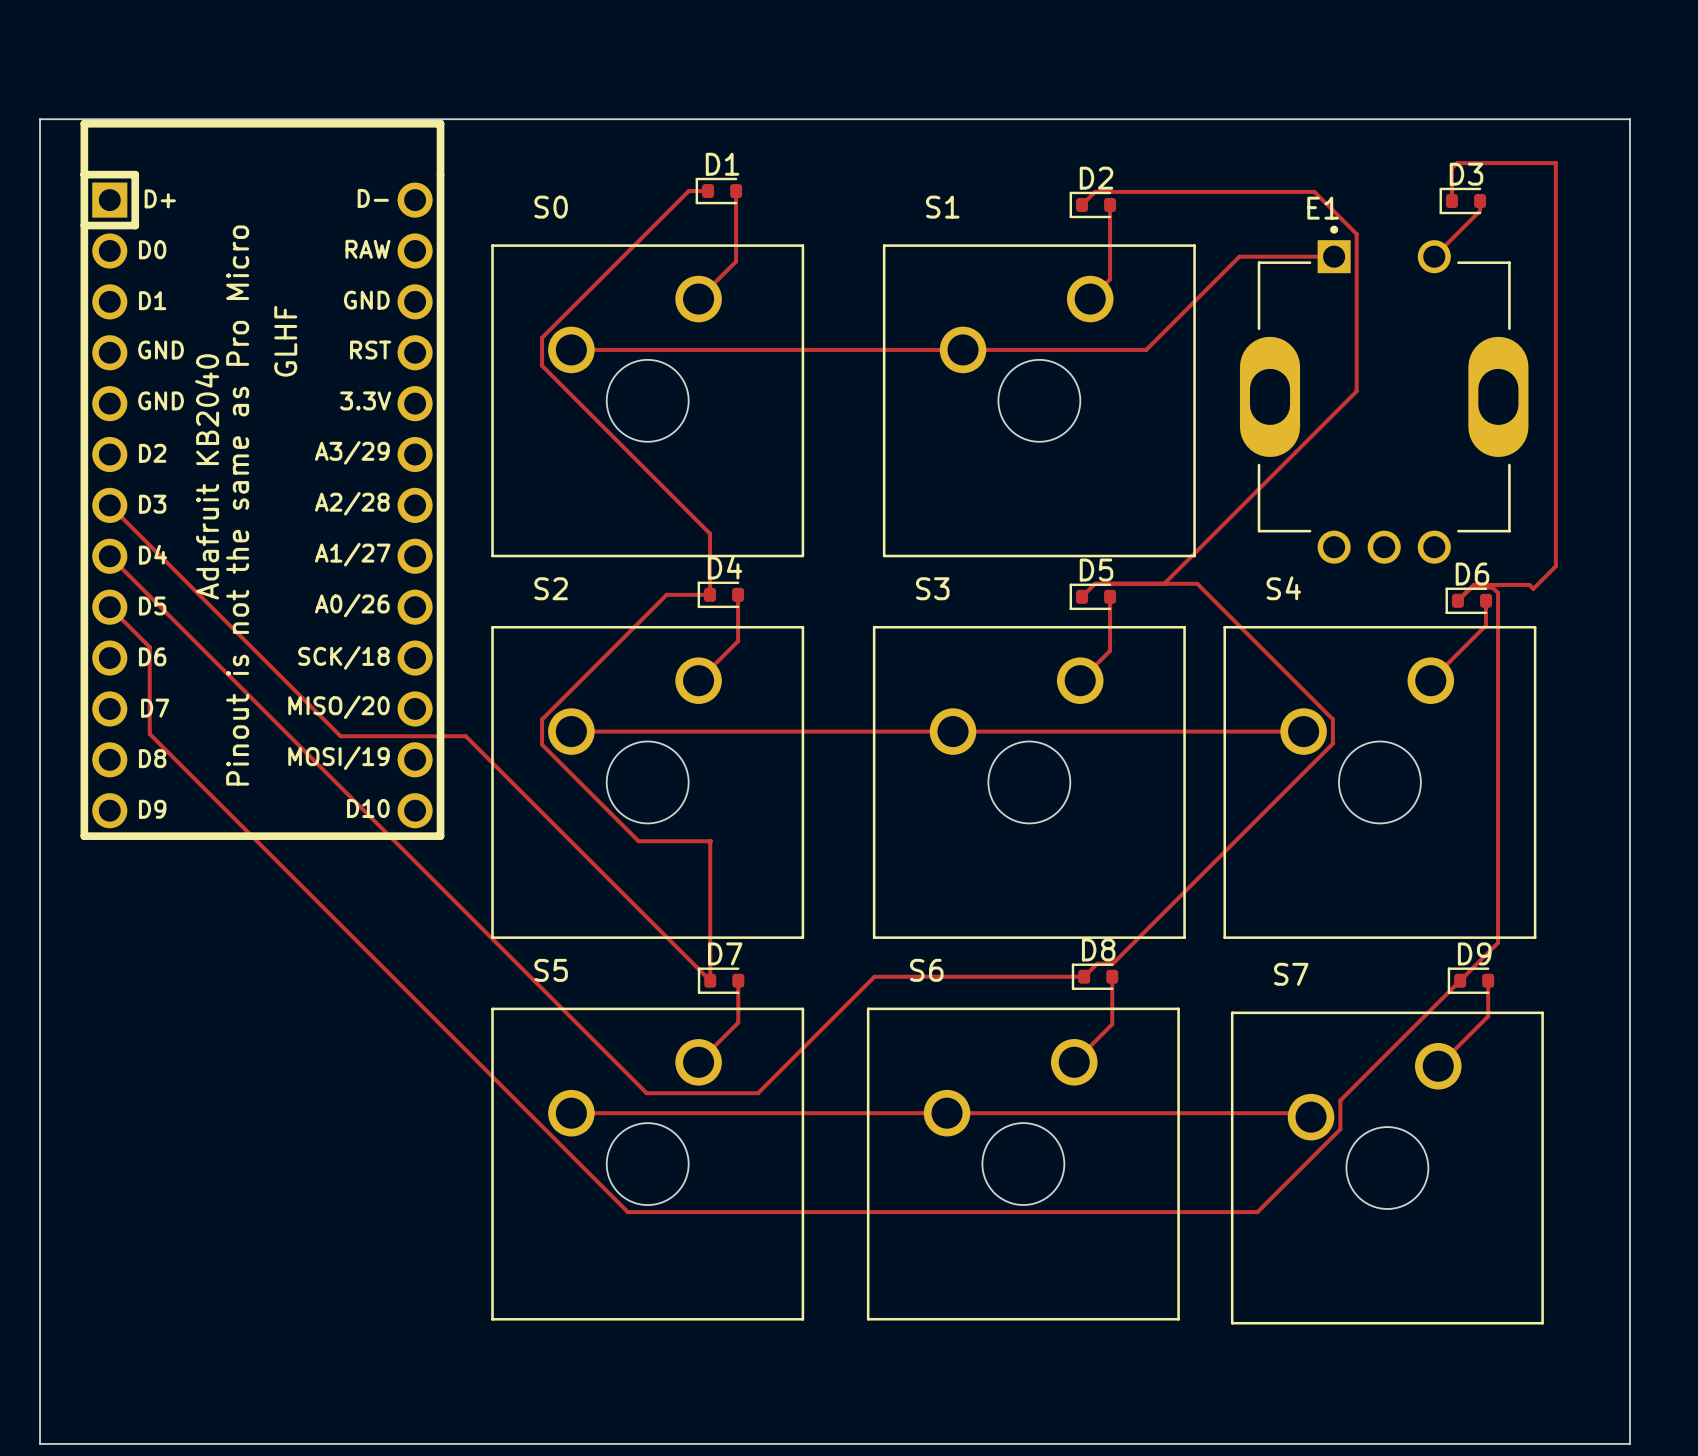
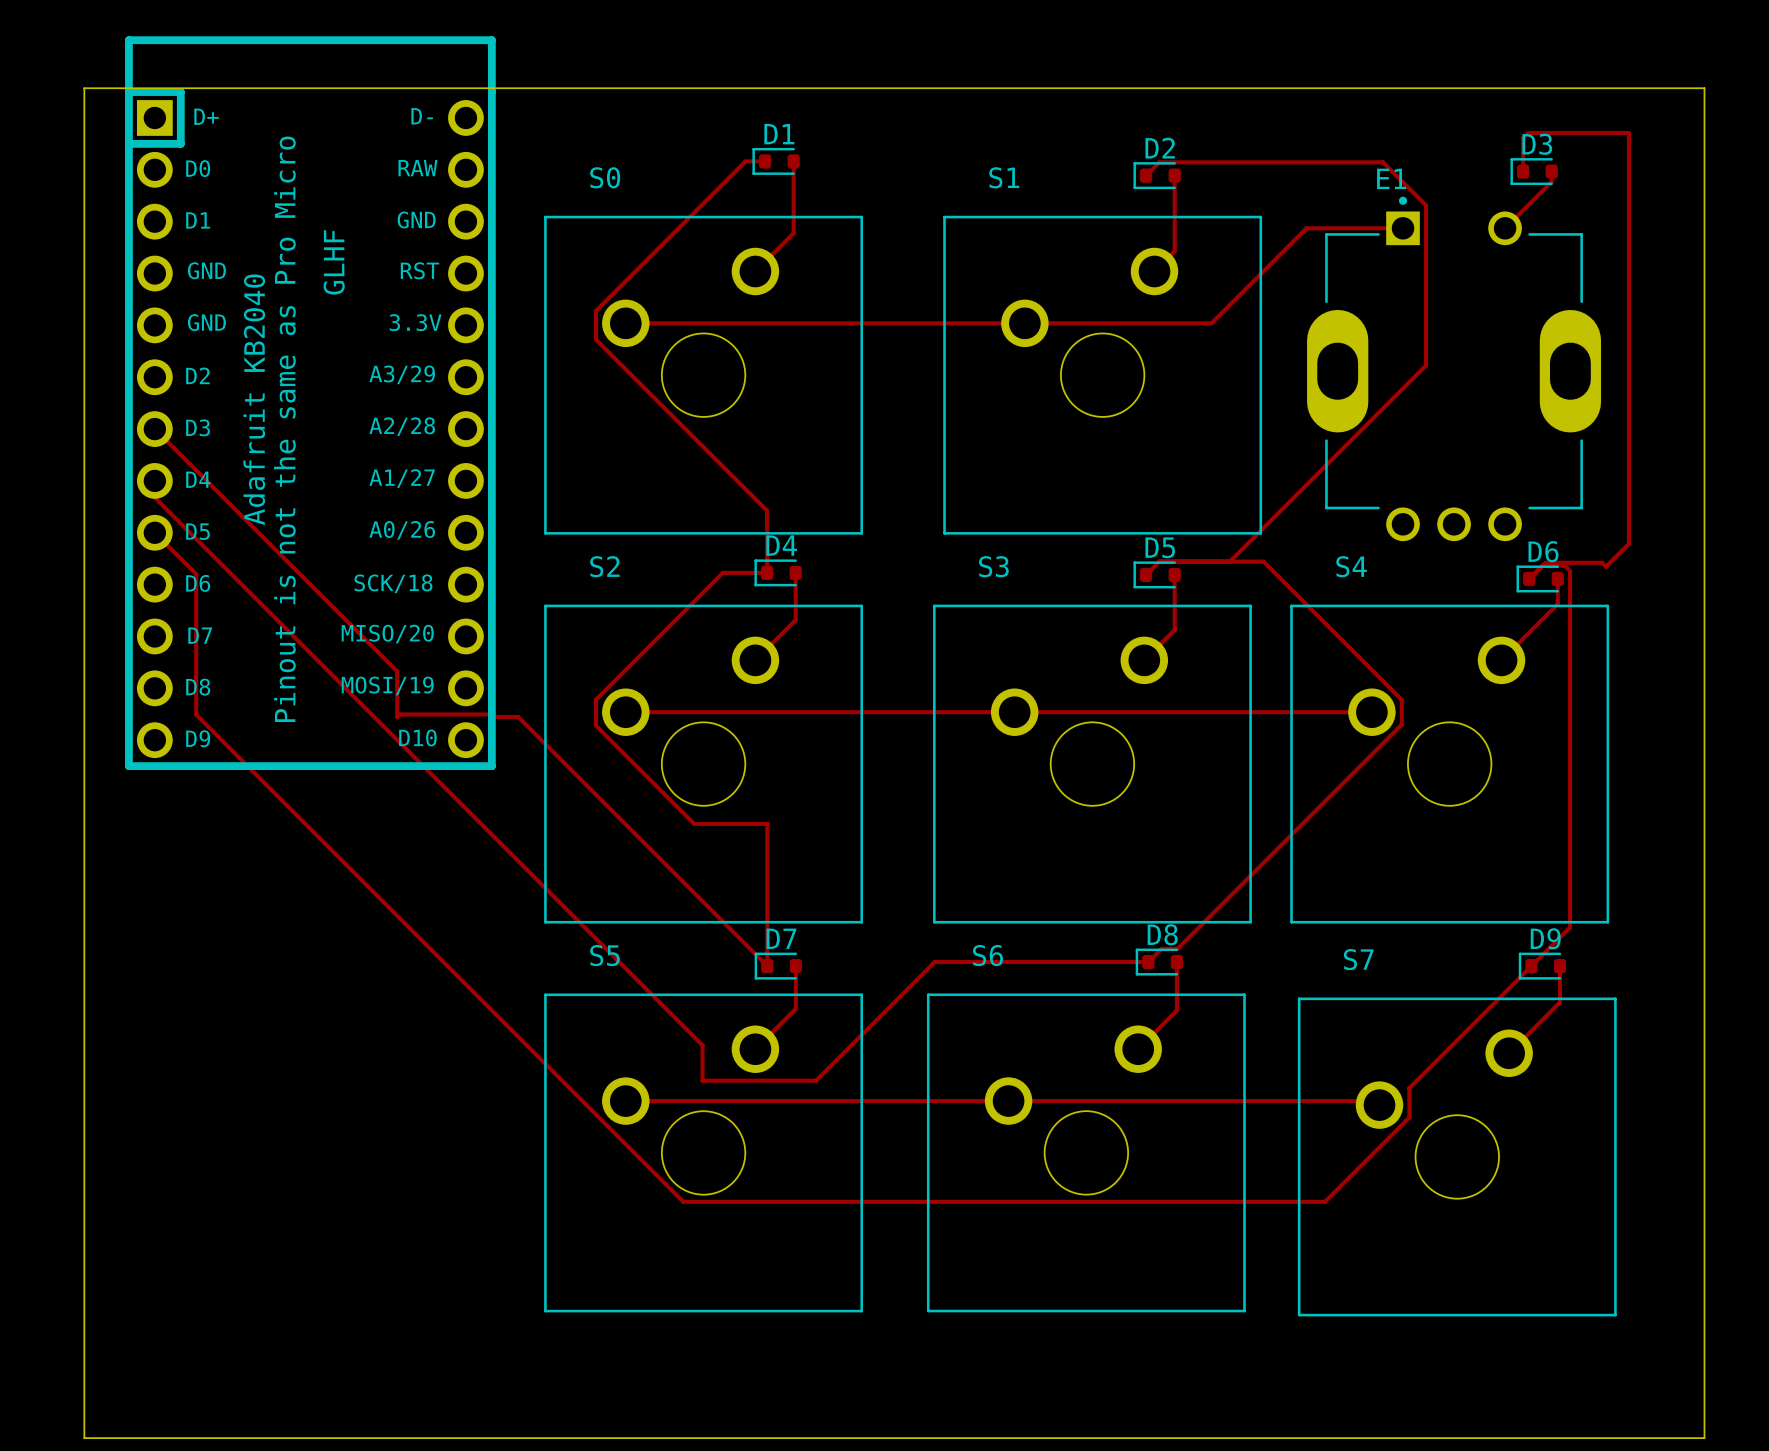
part position: (262, 479) -> (310, 403)
track: (109, 505) (340, 736) (439, 736) -> (154, 429) (397, 671) (397, 716) (399, 714) (489, 714) (491, 716)
track: (109, 556) (646, 1093) -> (154, 480) (154, 497) (702, 1045) (702, 1080)
track: (109, 607) (149, 647) -> (154, 532) (196, 574) (196, 626)

